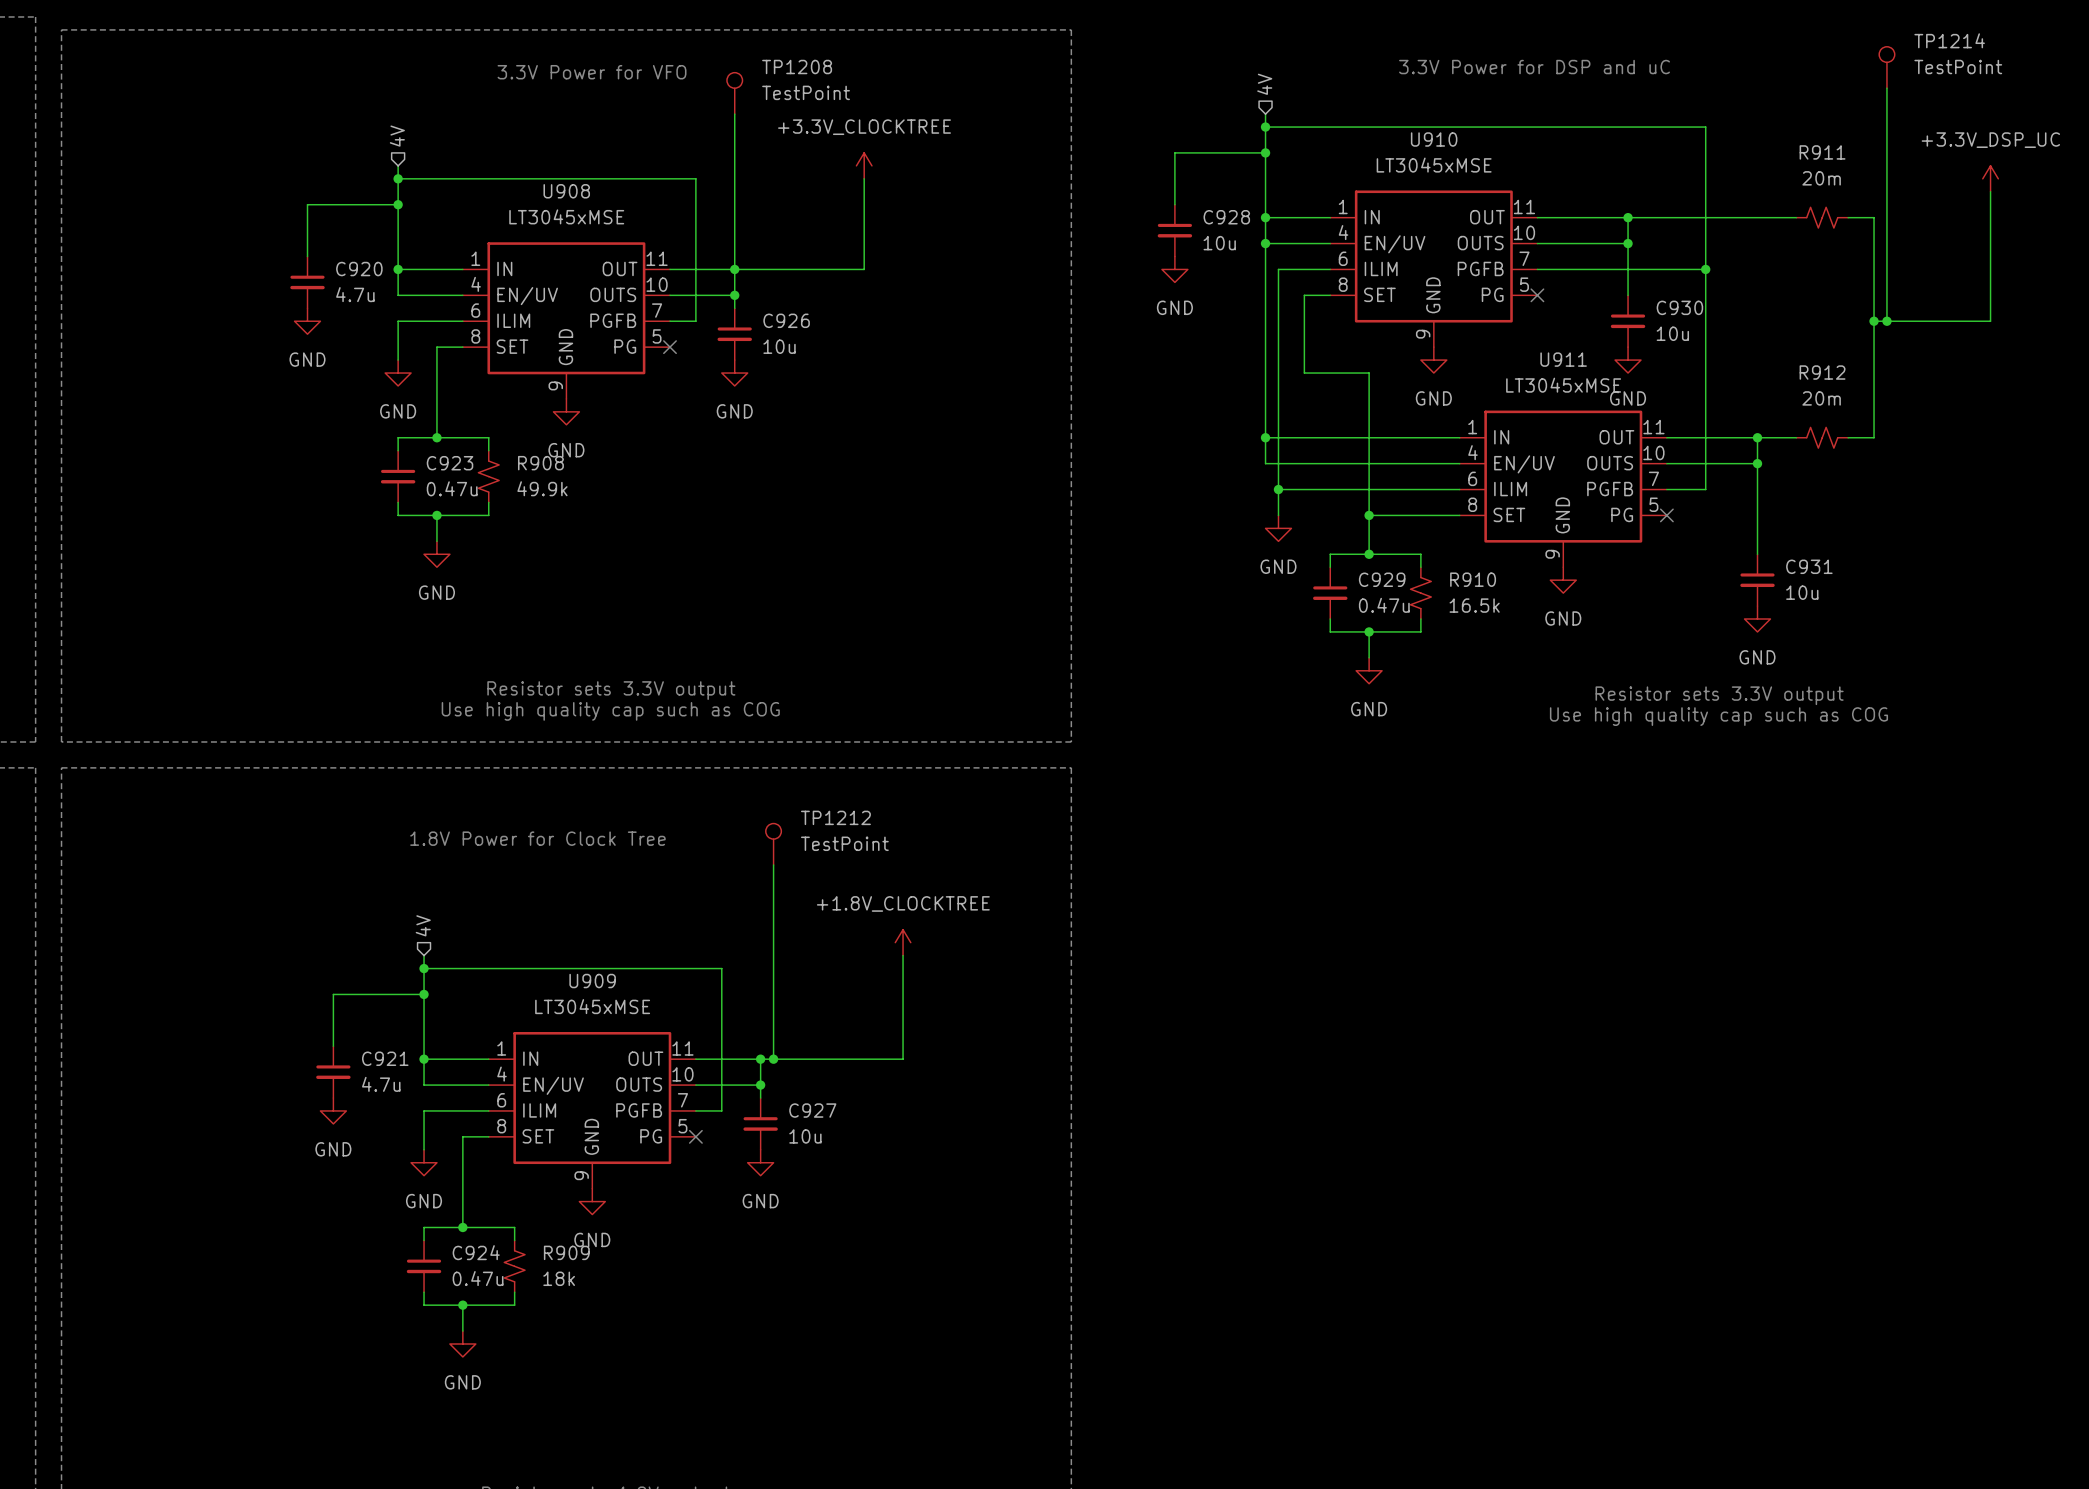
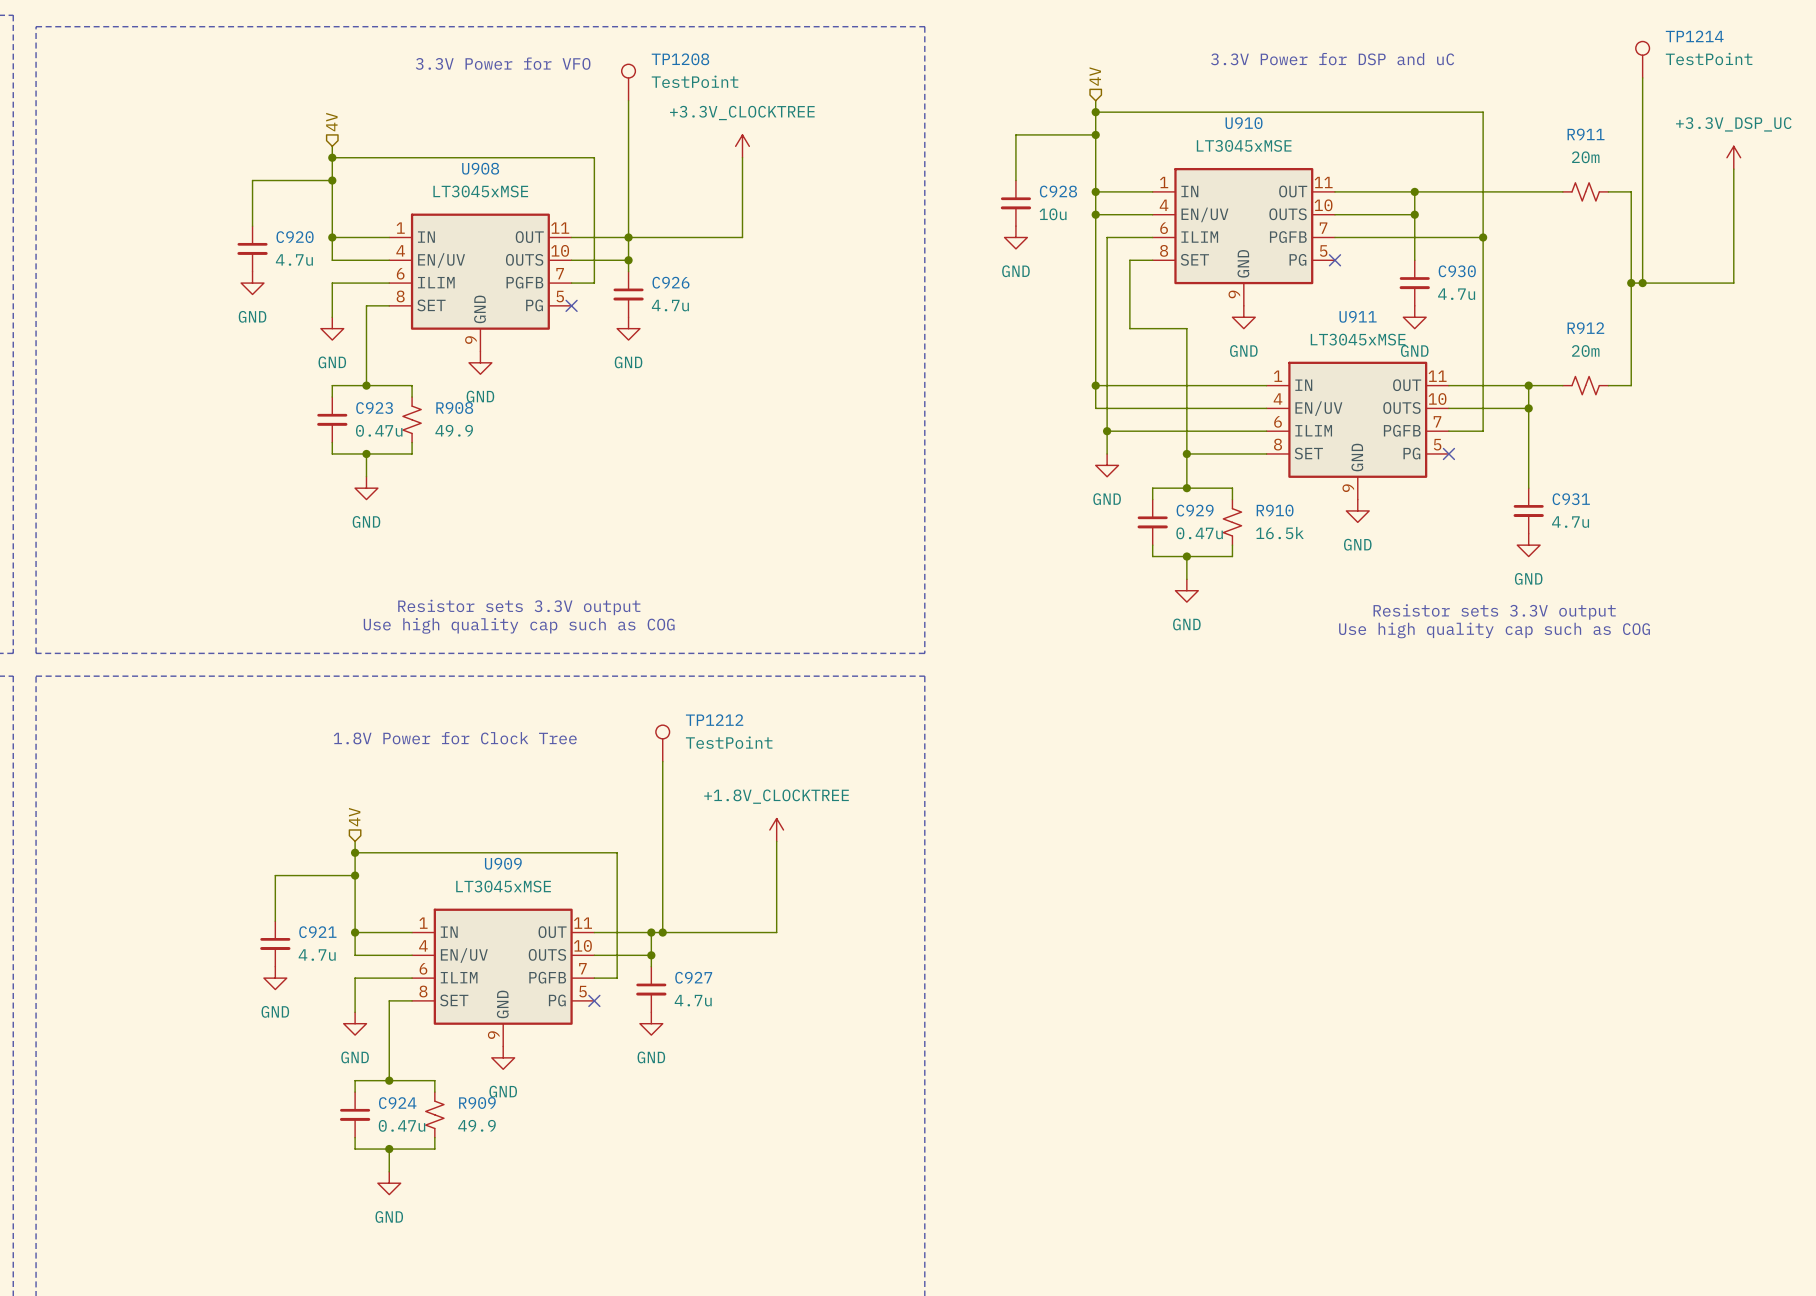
C930 value: 10u (1672, 333) -> 4.7u (1456, 294)
C926 value: 10u (779, 346) -> 4.7u (670, 305)
R908 value: 49.9k (542, 488) -> 49.9 (454, 430)
C931 value: 10u (1802, 592) -> 4.7u (1570, 522)
C927 value: 10u (805, 1136) -> 4.7u (693, 1000)
R909 value: 18k (559, 1278) -> 49.9 (476, 1125)

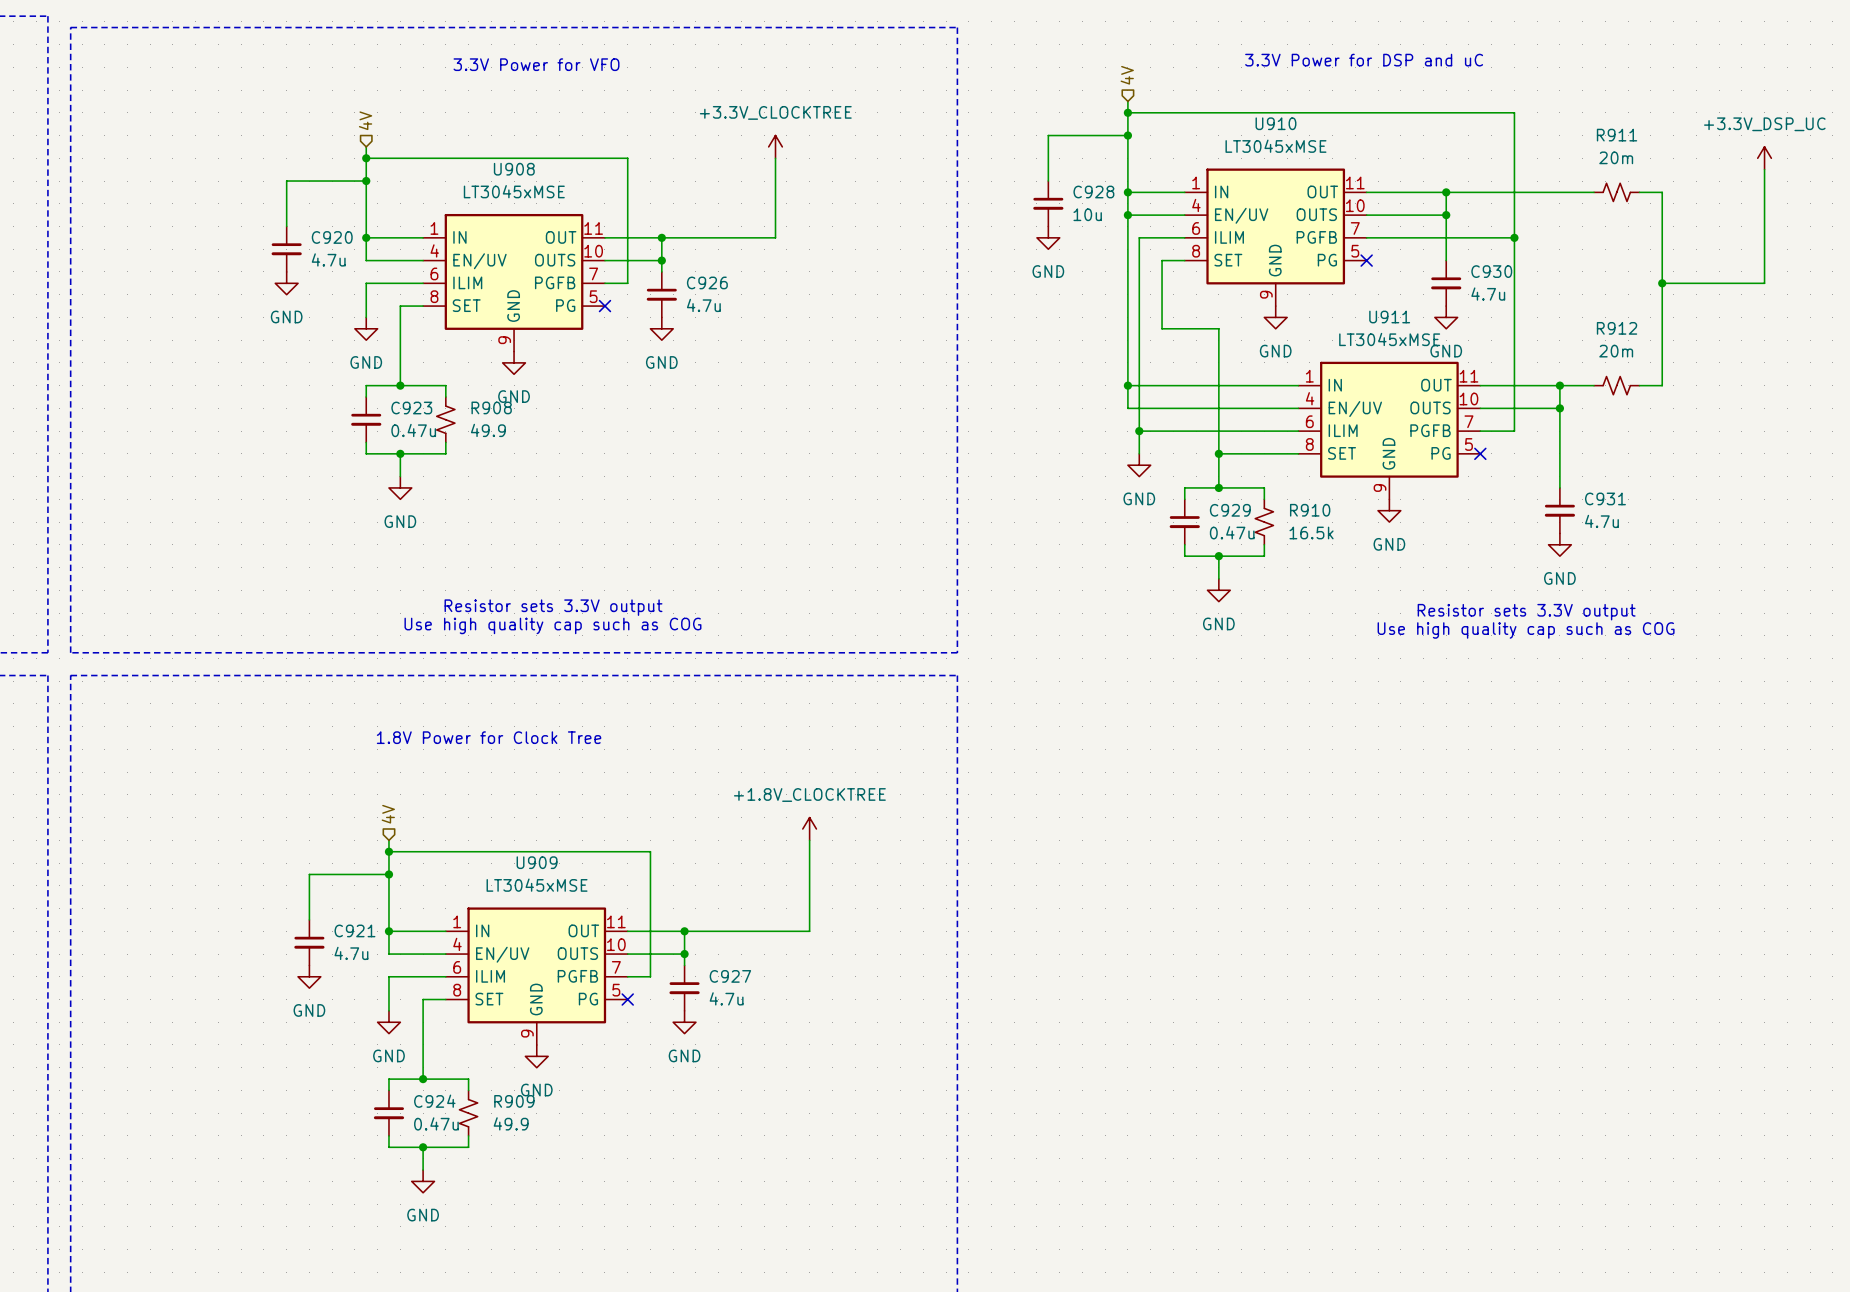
TP1214: TestPoint (1642, 59) -> none
wire: (1642, 77) (1642, 283) -> none
TP1208: TestPoint (628, 82) -> none
wire: (628, 100) (628, 237) -> none
junction: (1642, 283) -> none
TP1212: TestPoint (662, 743) -> none
wire: (662, 761) (662, 932) -> none
junction: (662, 932) -> none

